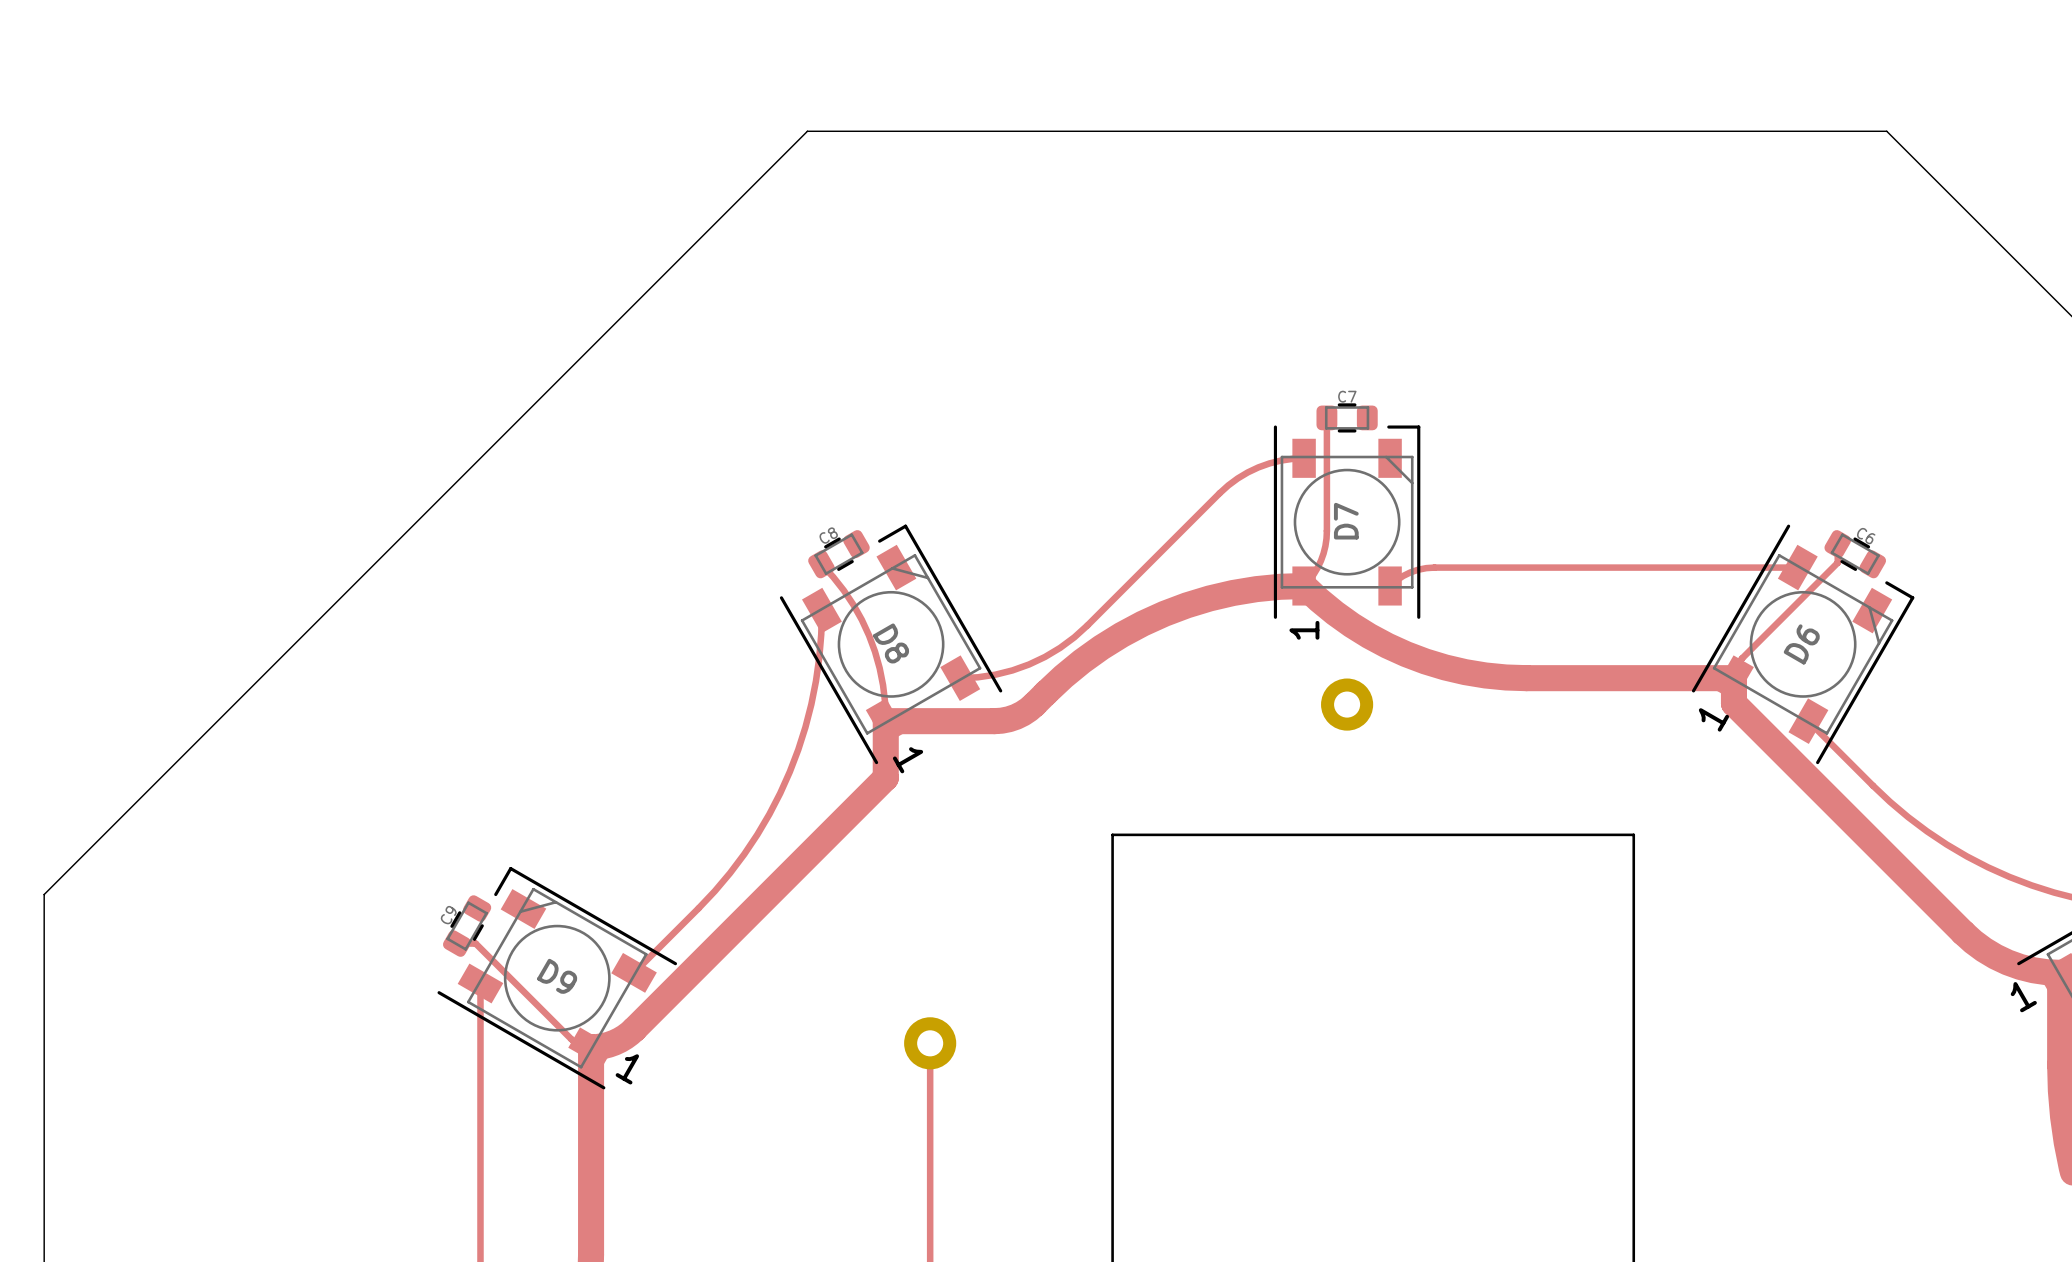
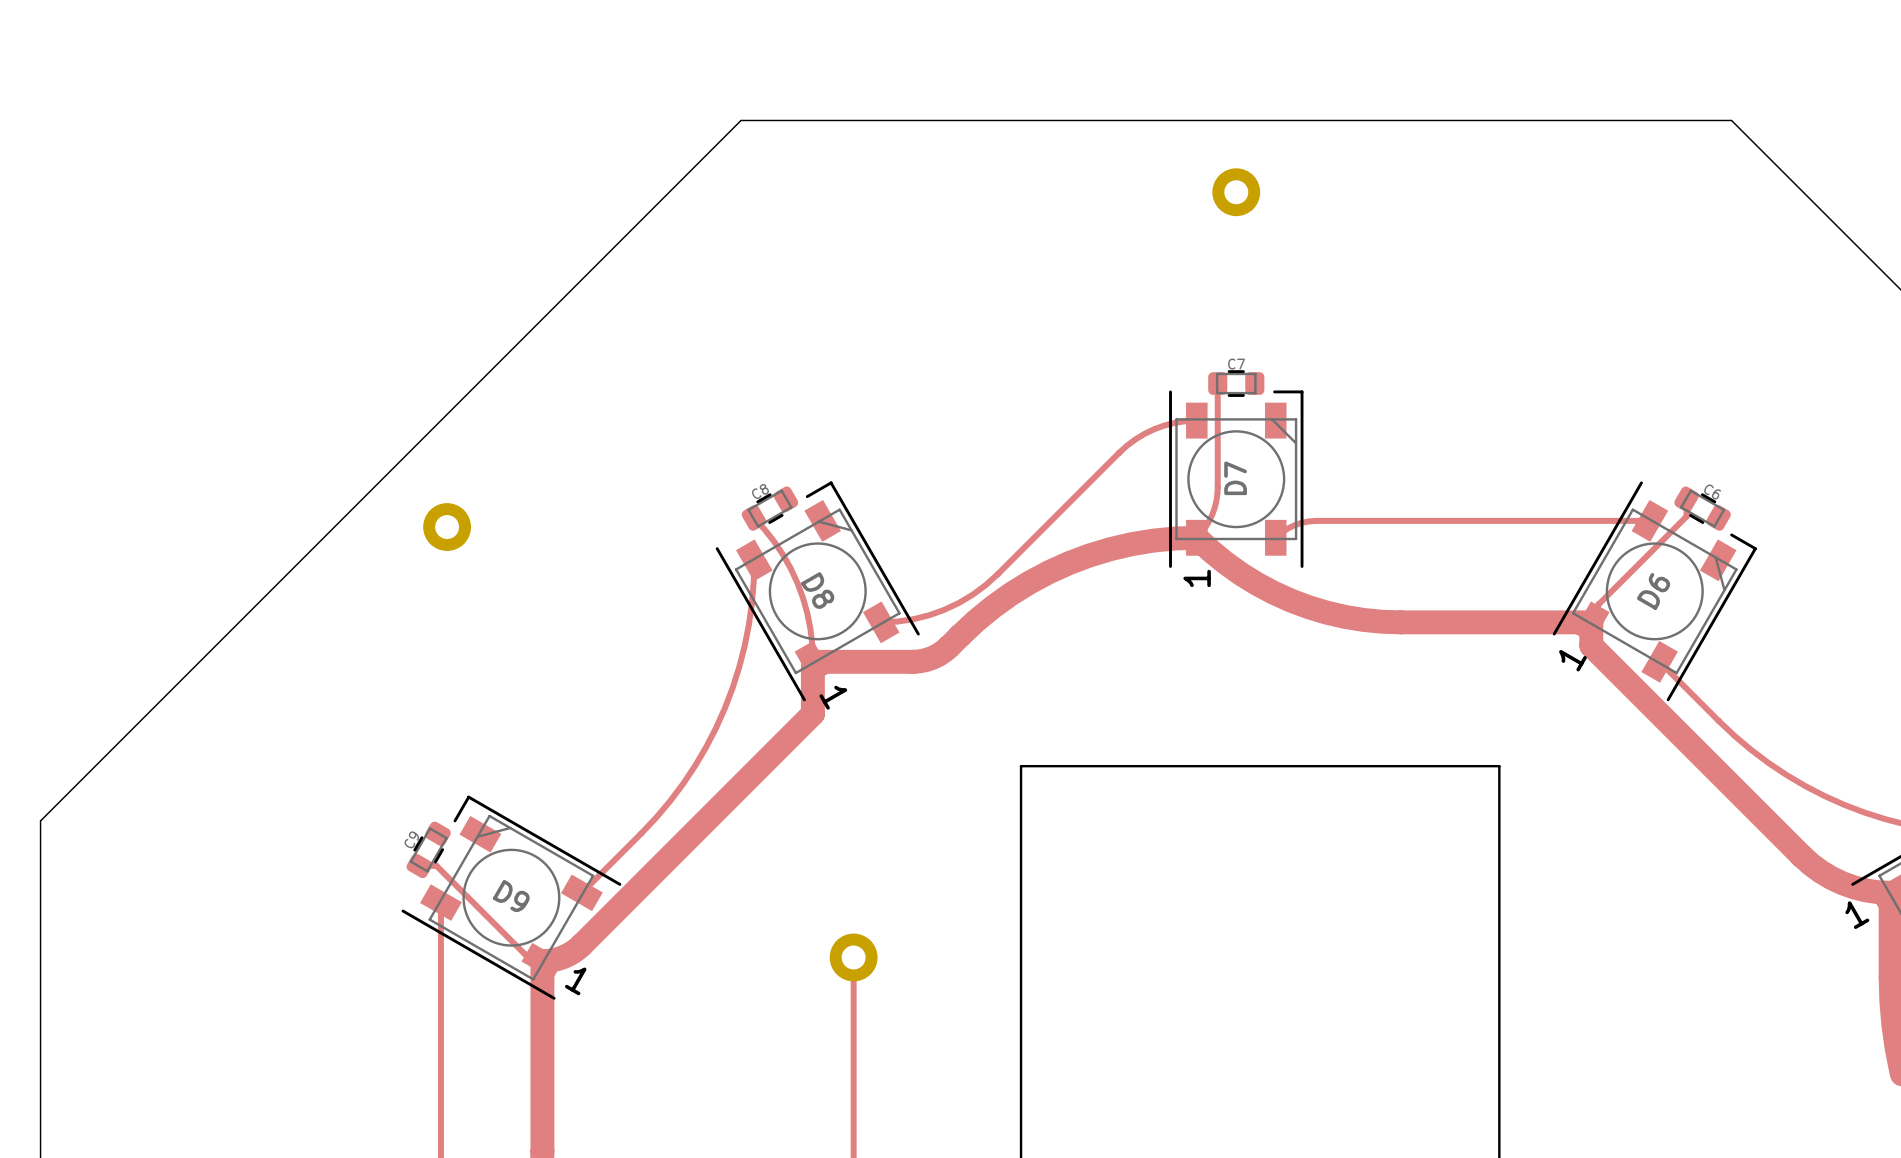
part: none -> (1236, 192)
part: none -> (447, 527)
part: (1347, 704) -> none

